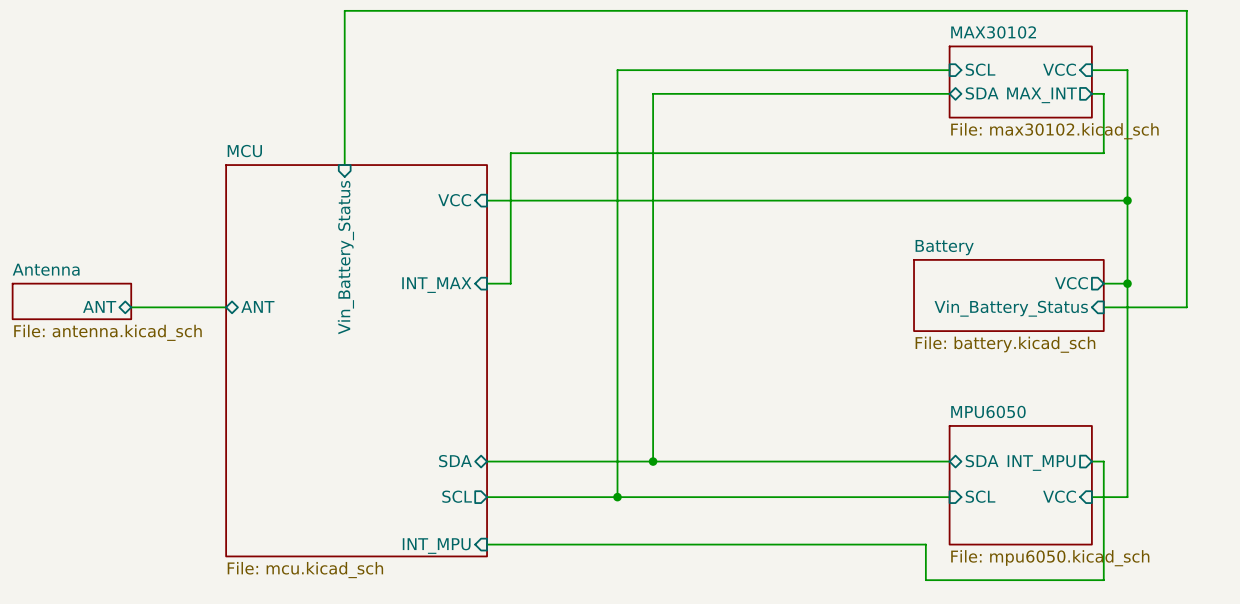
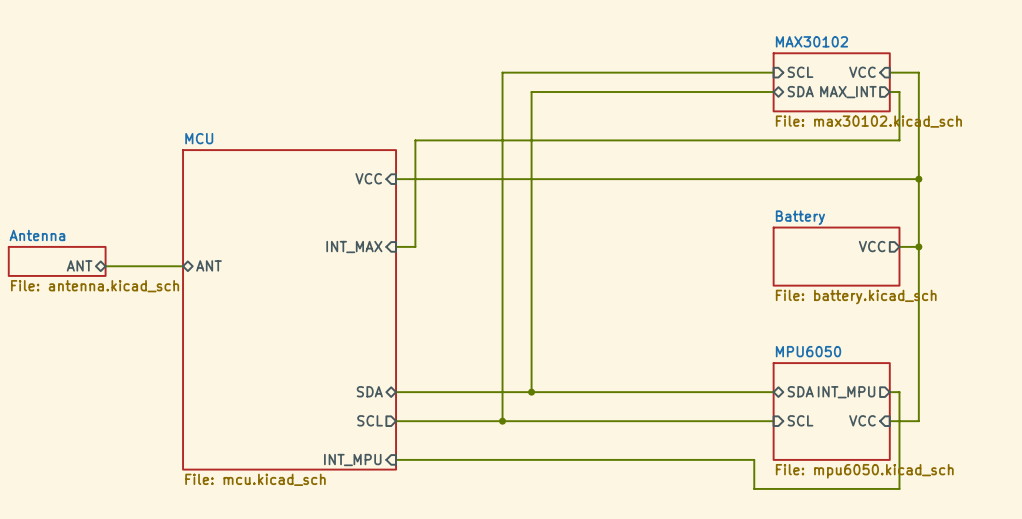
wire: (344, 165) (344, 10) (1186, 10) (1186, 307) (1103, 307) -> none
sheet pin: Vin_Battery_Status (345, 257) -> none
sheet Battery: File: battery.kicad_sch (1008, 295) -> none
sheet Battery: none -> File: battery.kicad_sch (836, 256)
sheet pin: Vin_Battery_Status (1011, 308) -> none

